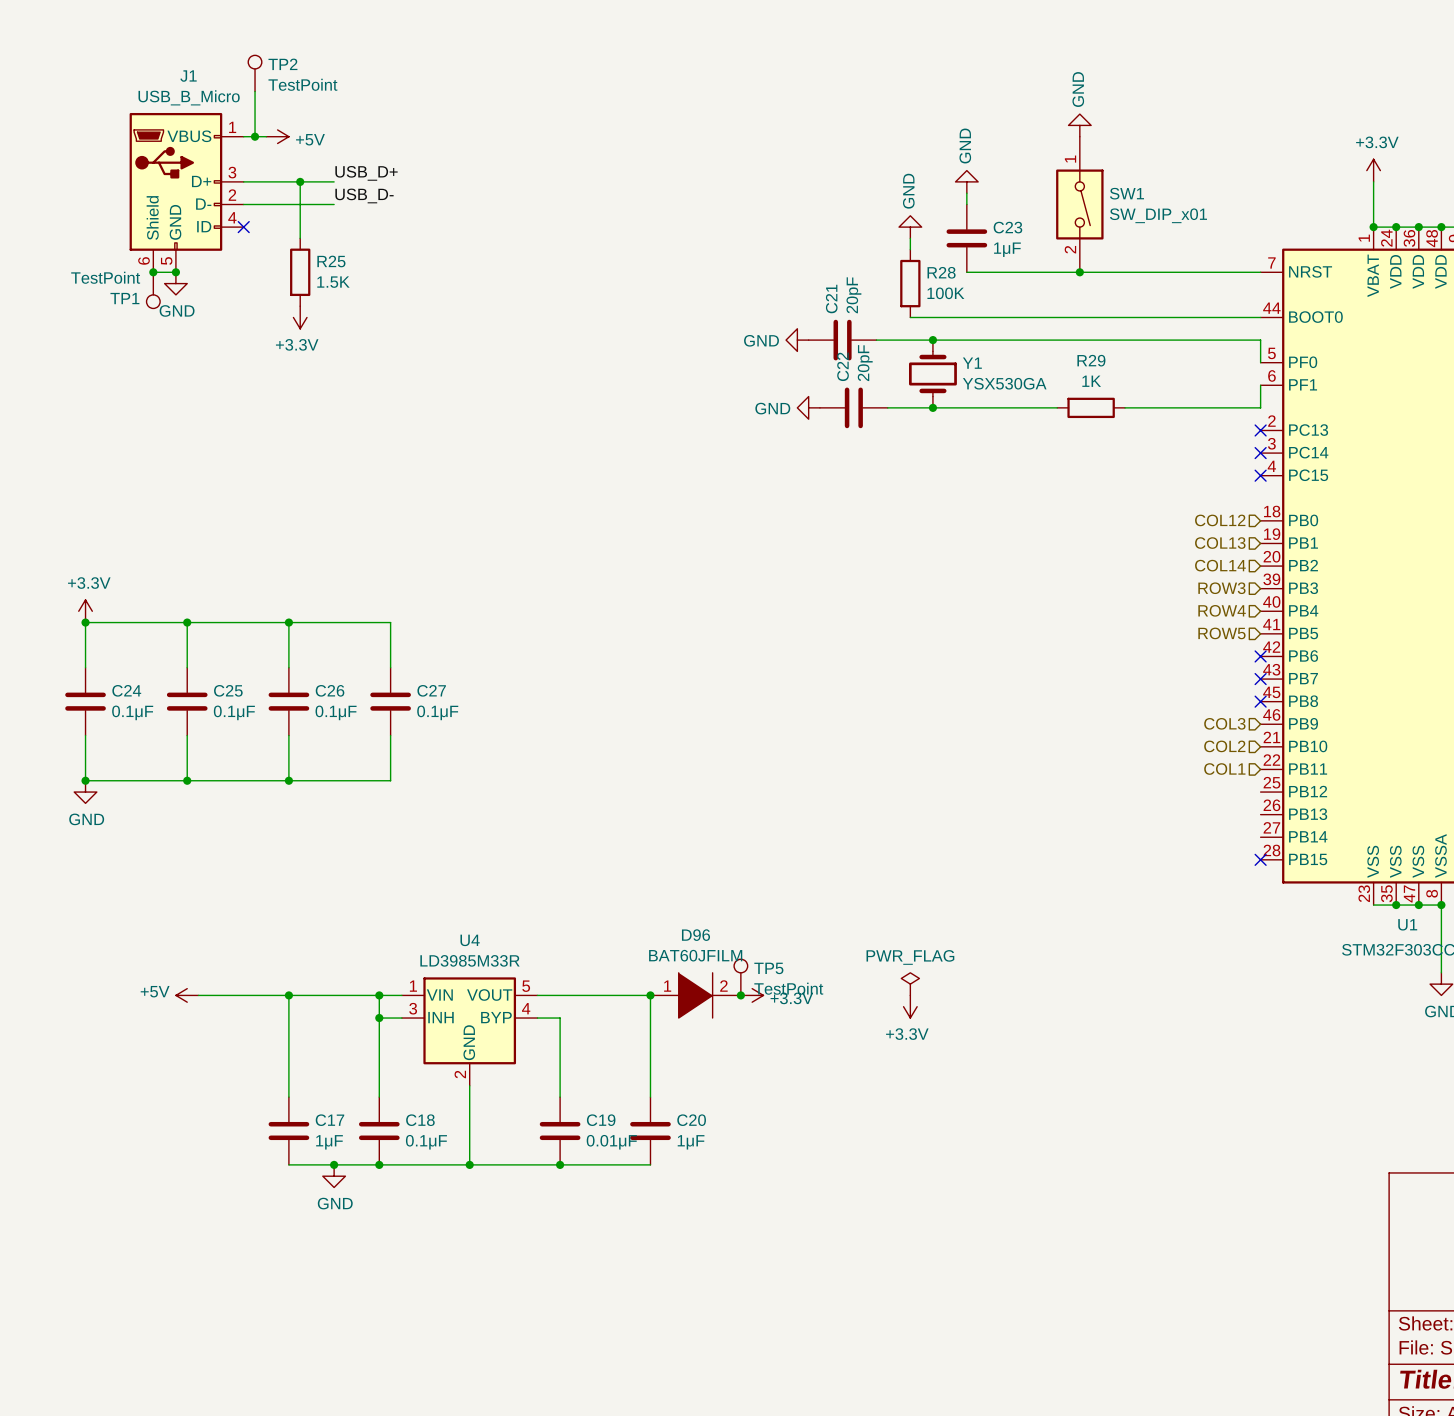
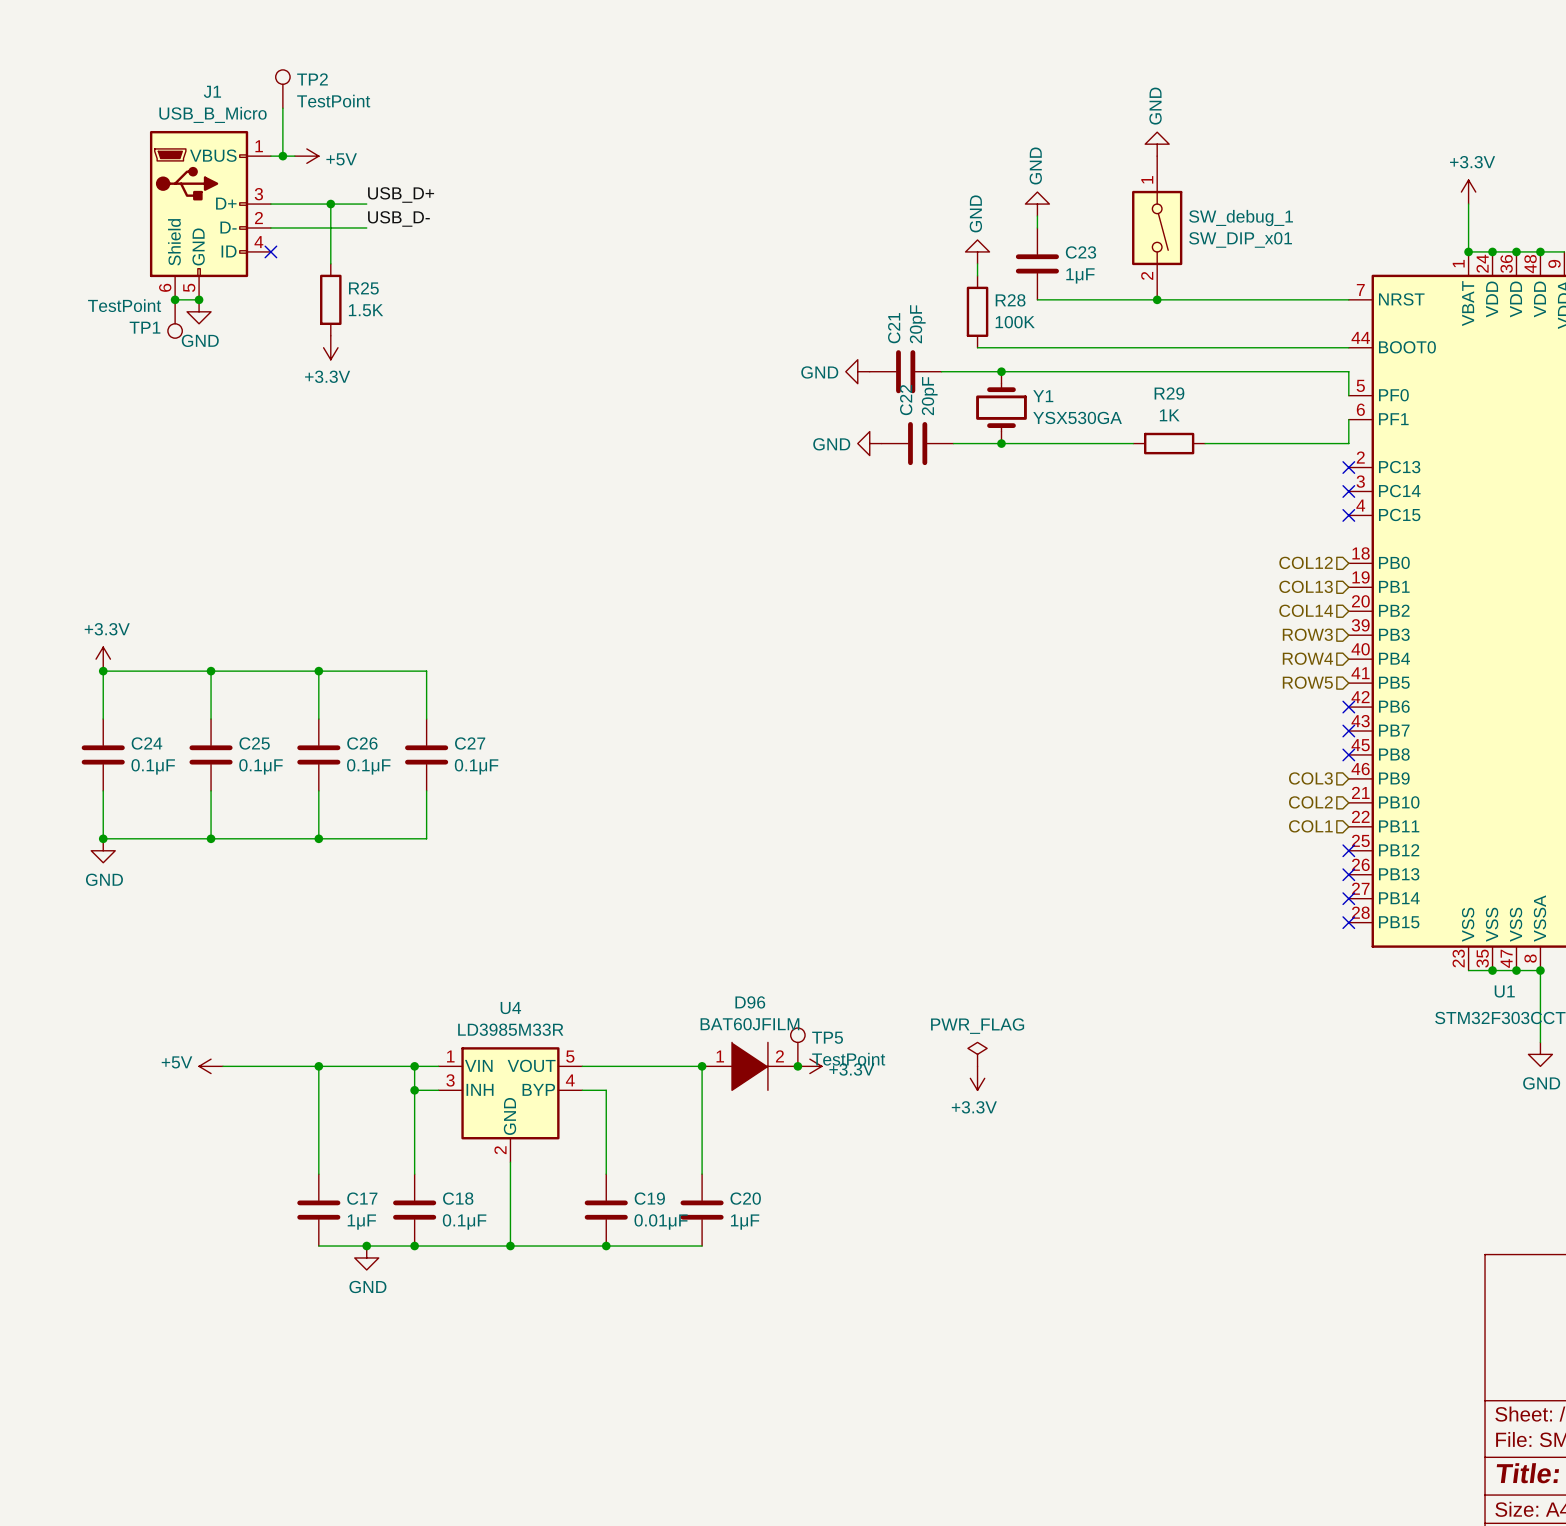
SW1 name: SW1 (1126, 193) -> SW_debug_1 (1241, 218)
no-connect mark: none -> (1348, 850)
no-connect mark: none -> (1348, 874)
no-connect mark: none -> (1348, 898)

